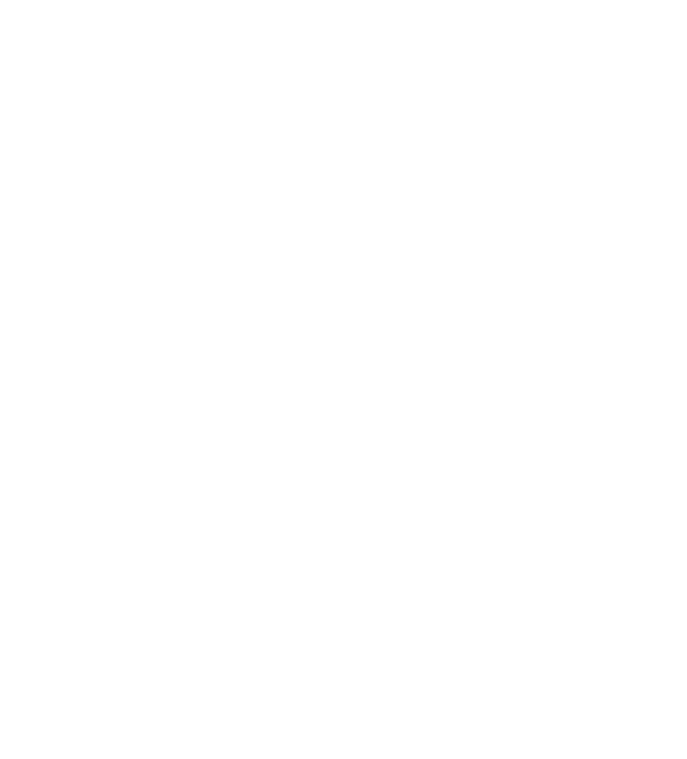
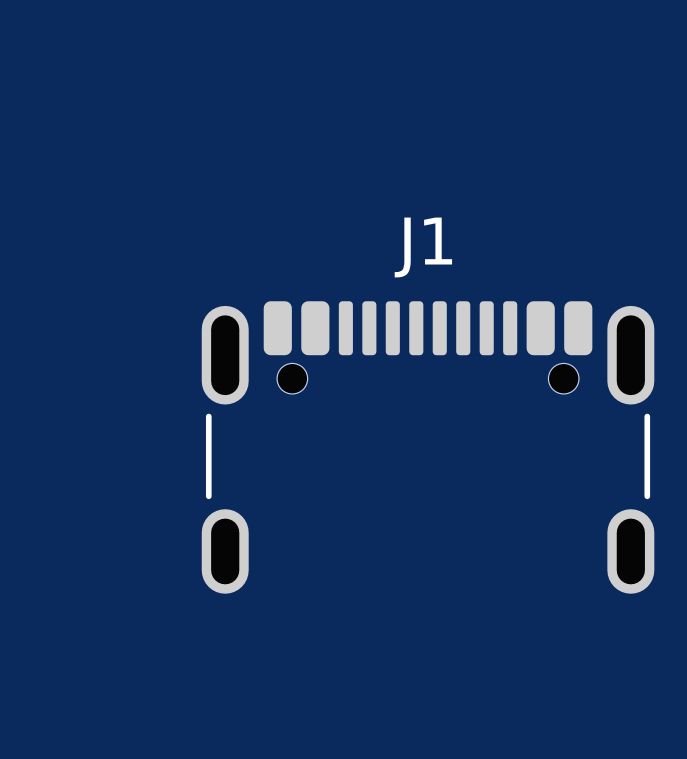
J1: none -> (428, 447)

